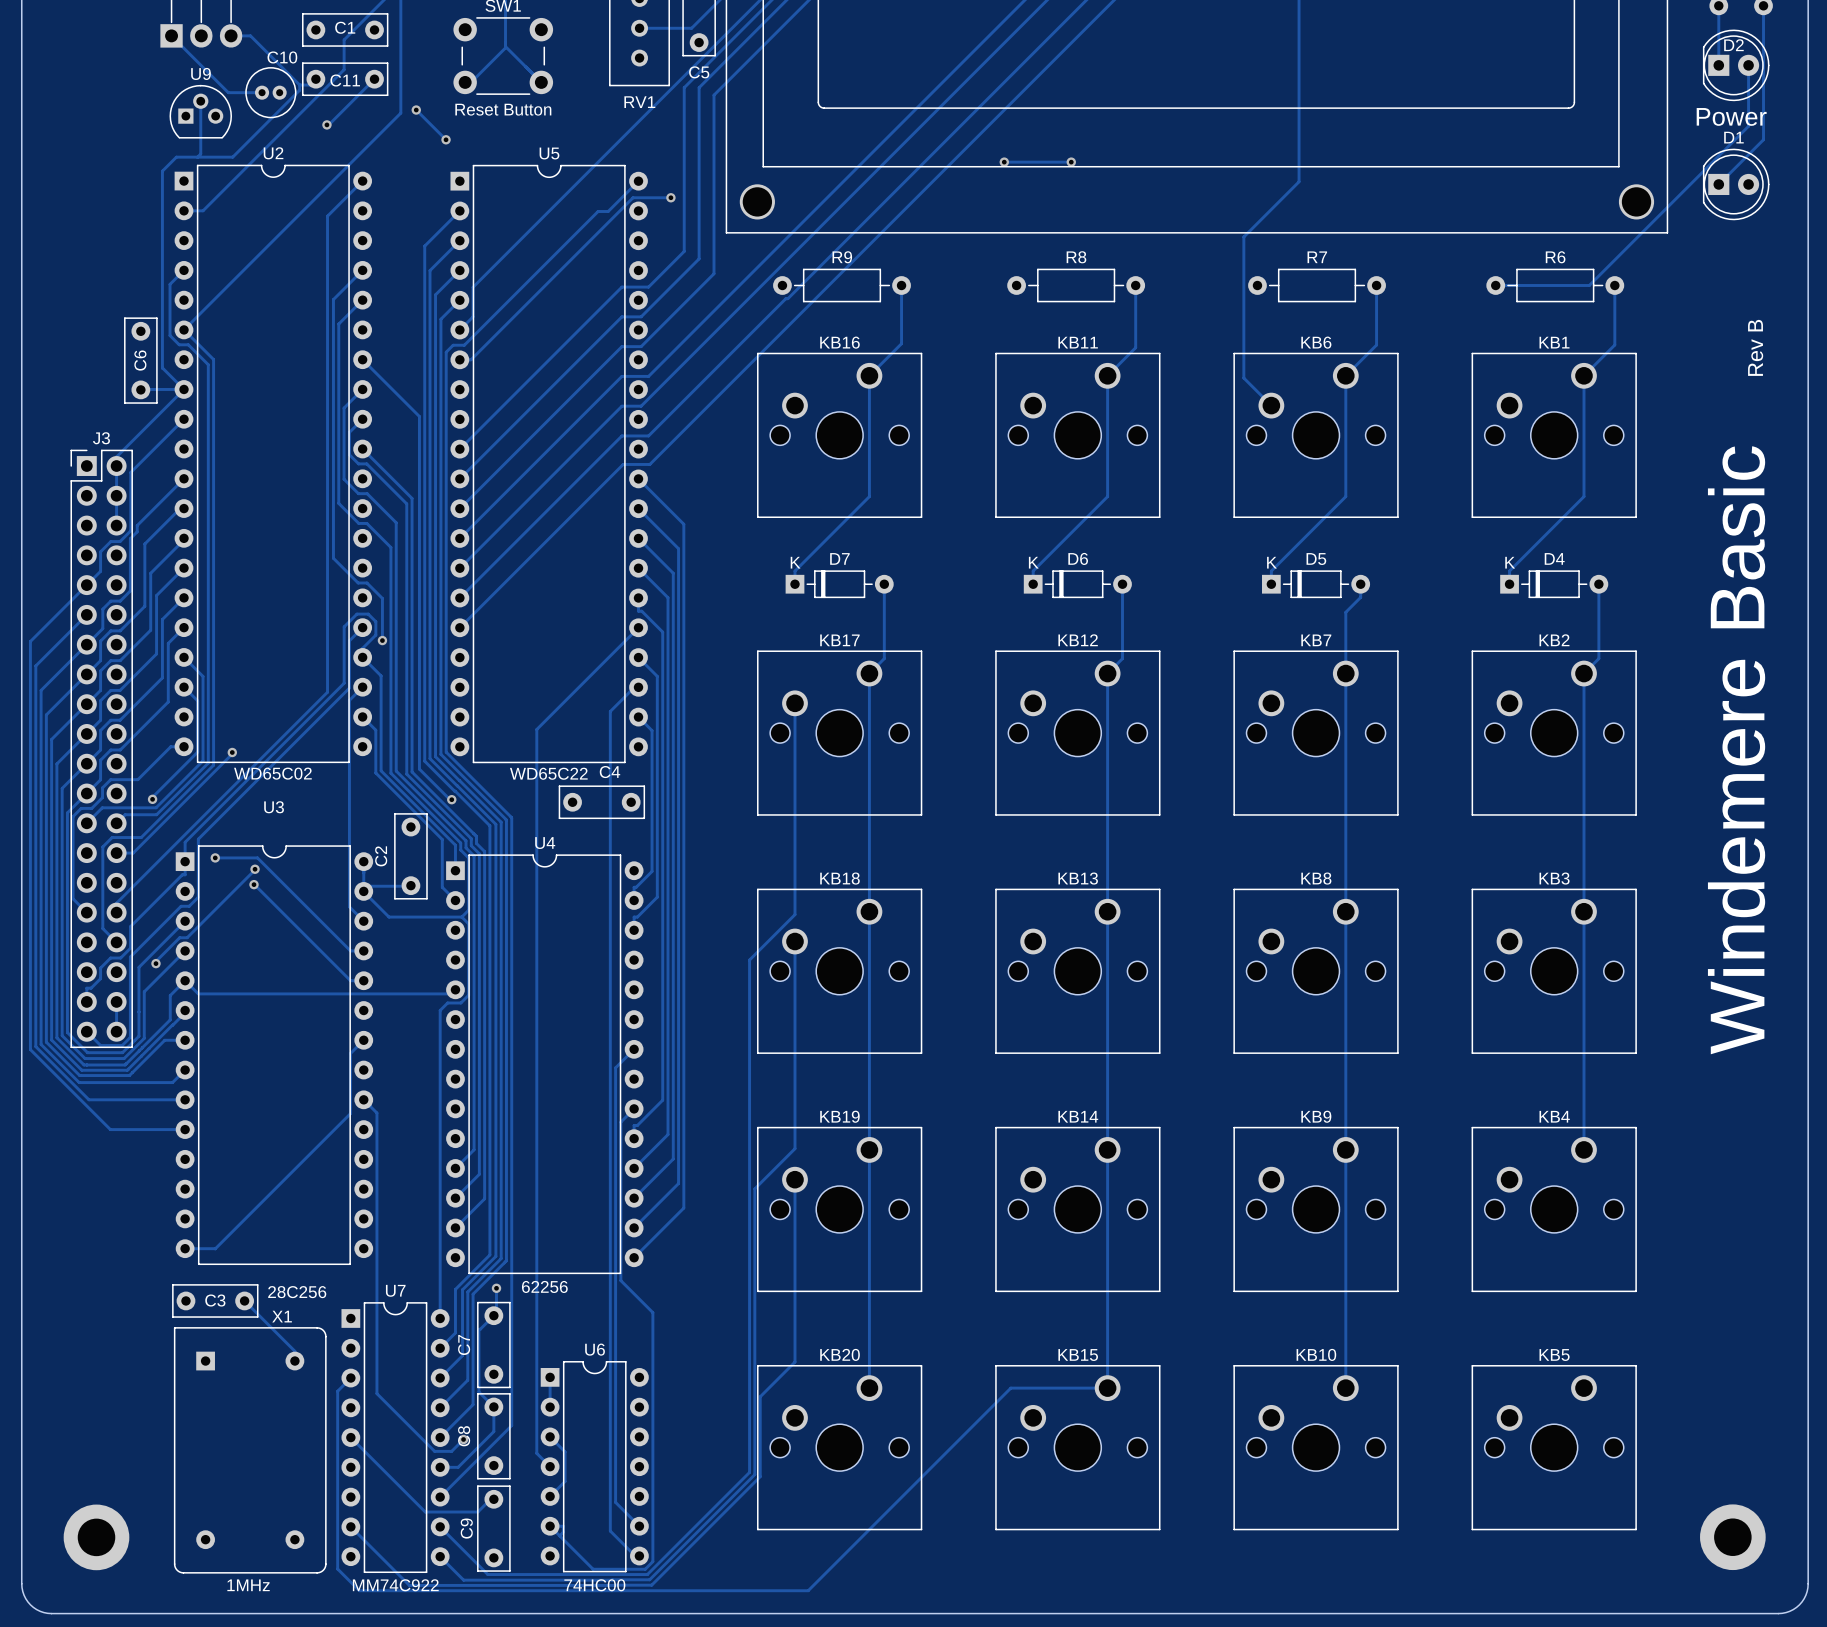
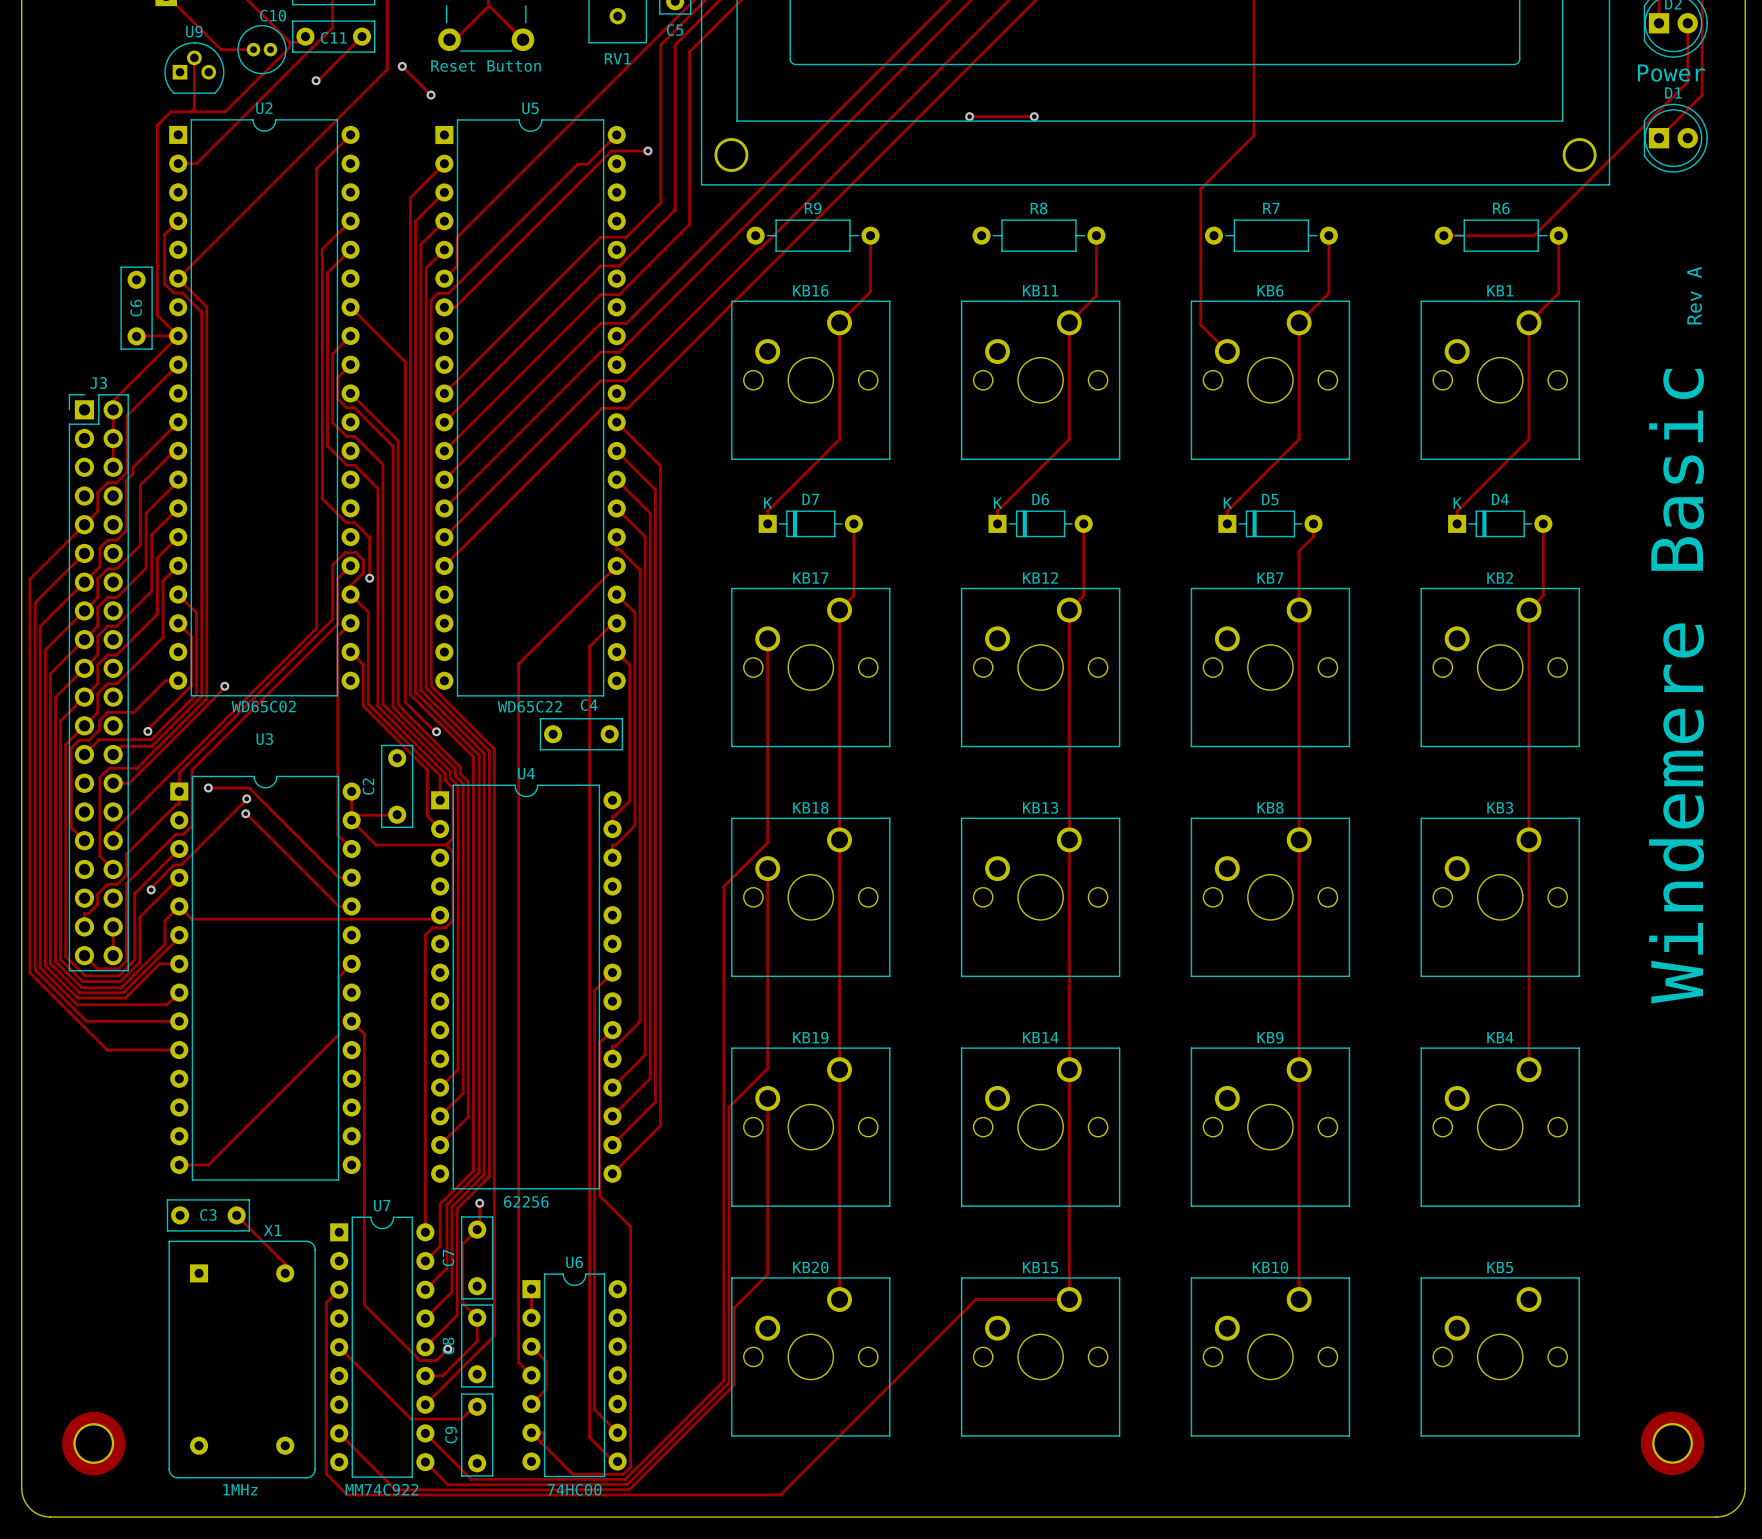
text: Rev B (1755, 347) -> Rev A (1694, 295)
U3 value: 28C256 (297, 1292) -> none

